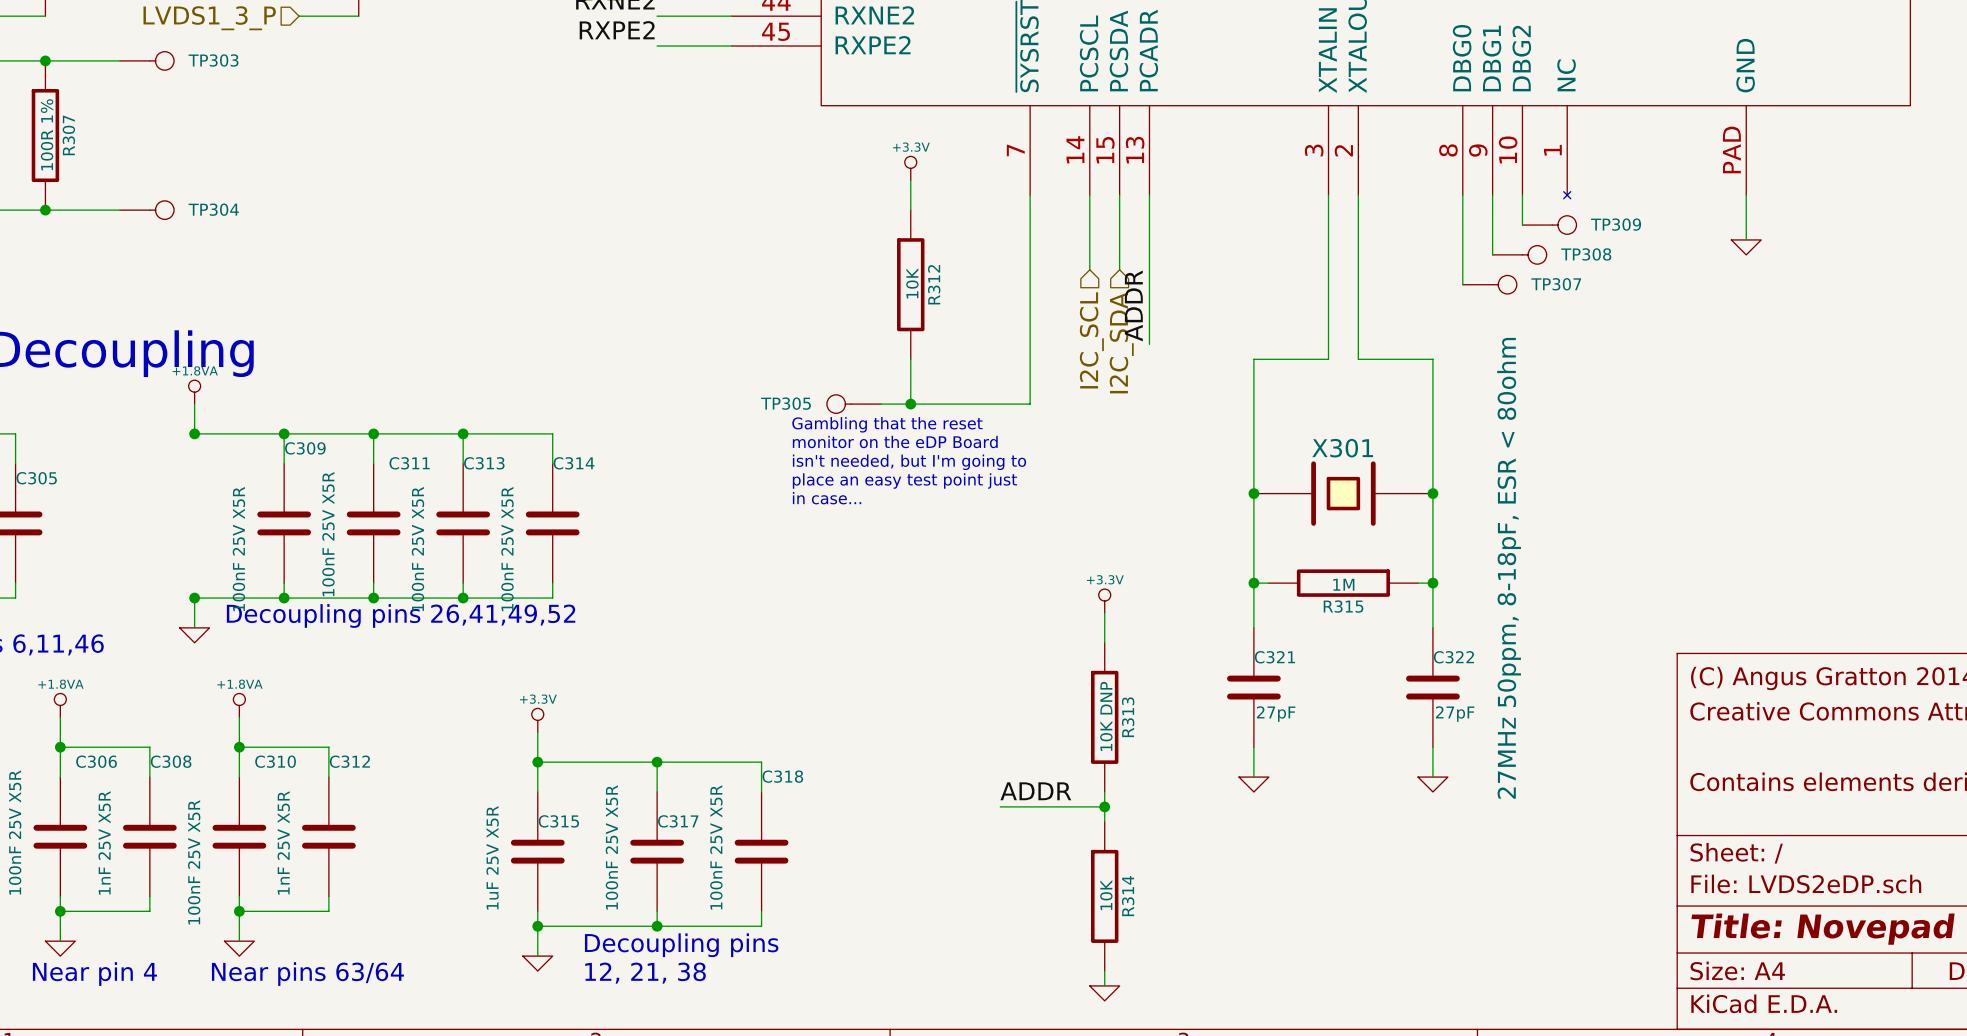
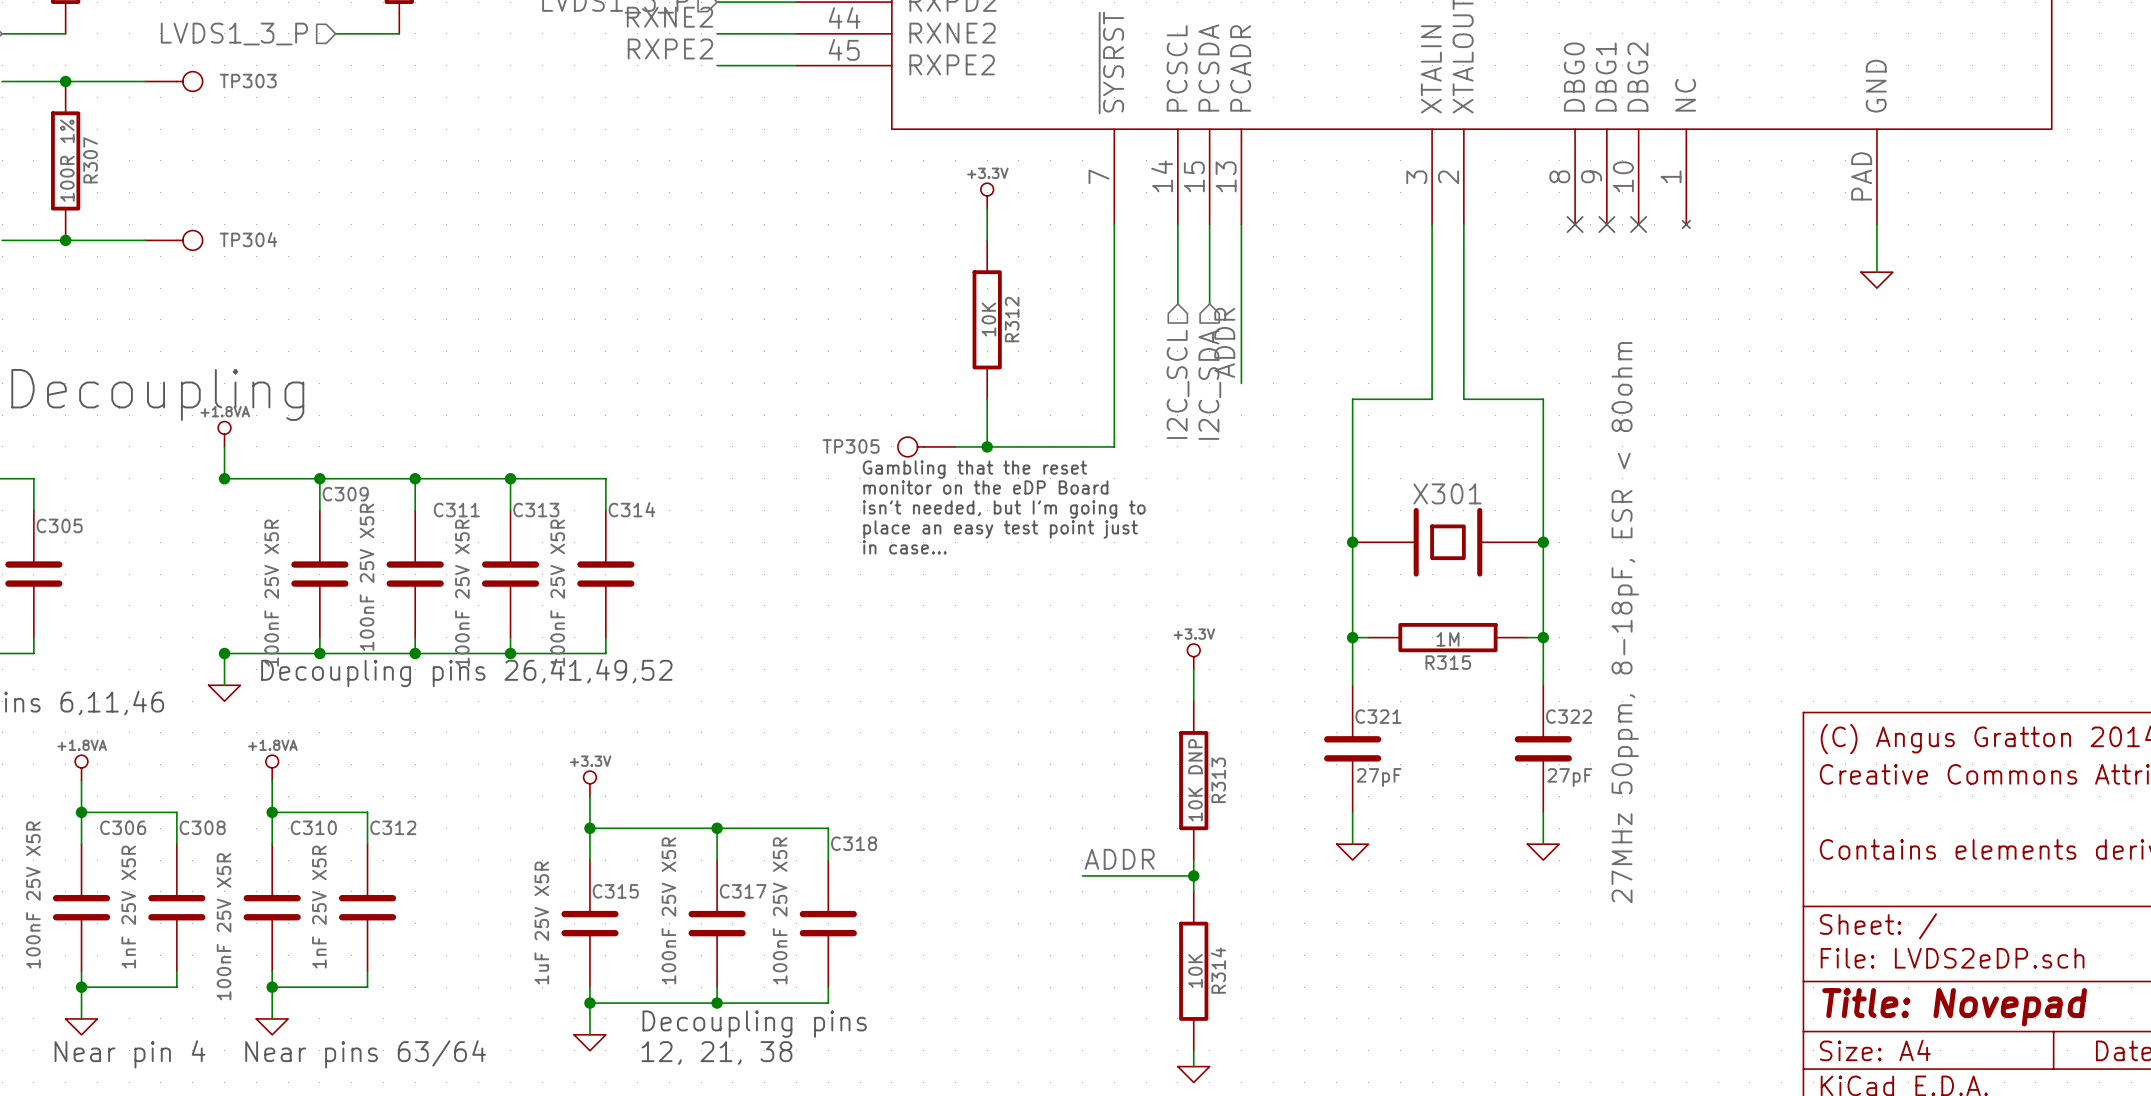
wire: (1462, 195) (1462, 284) -> none
no-connect mark: none -> (1575, 224)
wire: (1492, 195) (1492, 254) -> none
no-connect mark: none -> (1606, 224)
wire: (1522, 195) (1522, 225) -> none
no-connect mark: none -> (1638, 224)
TP309: (1549, 225) -> none
TP308: (1519, 254) -> none
TP307: (1489, 284) -> none

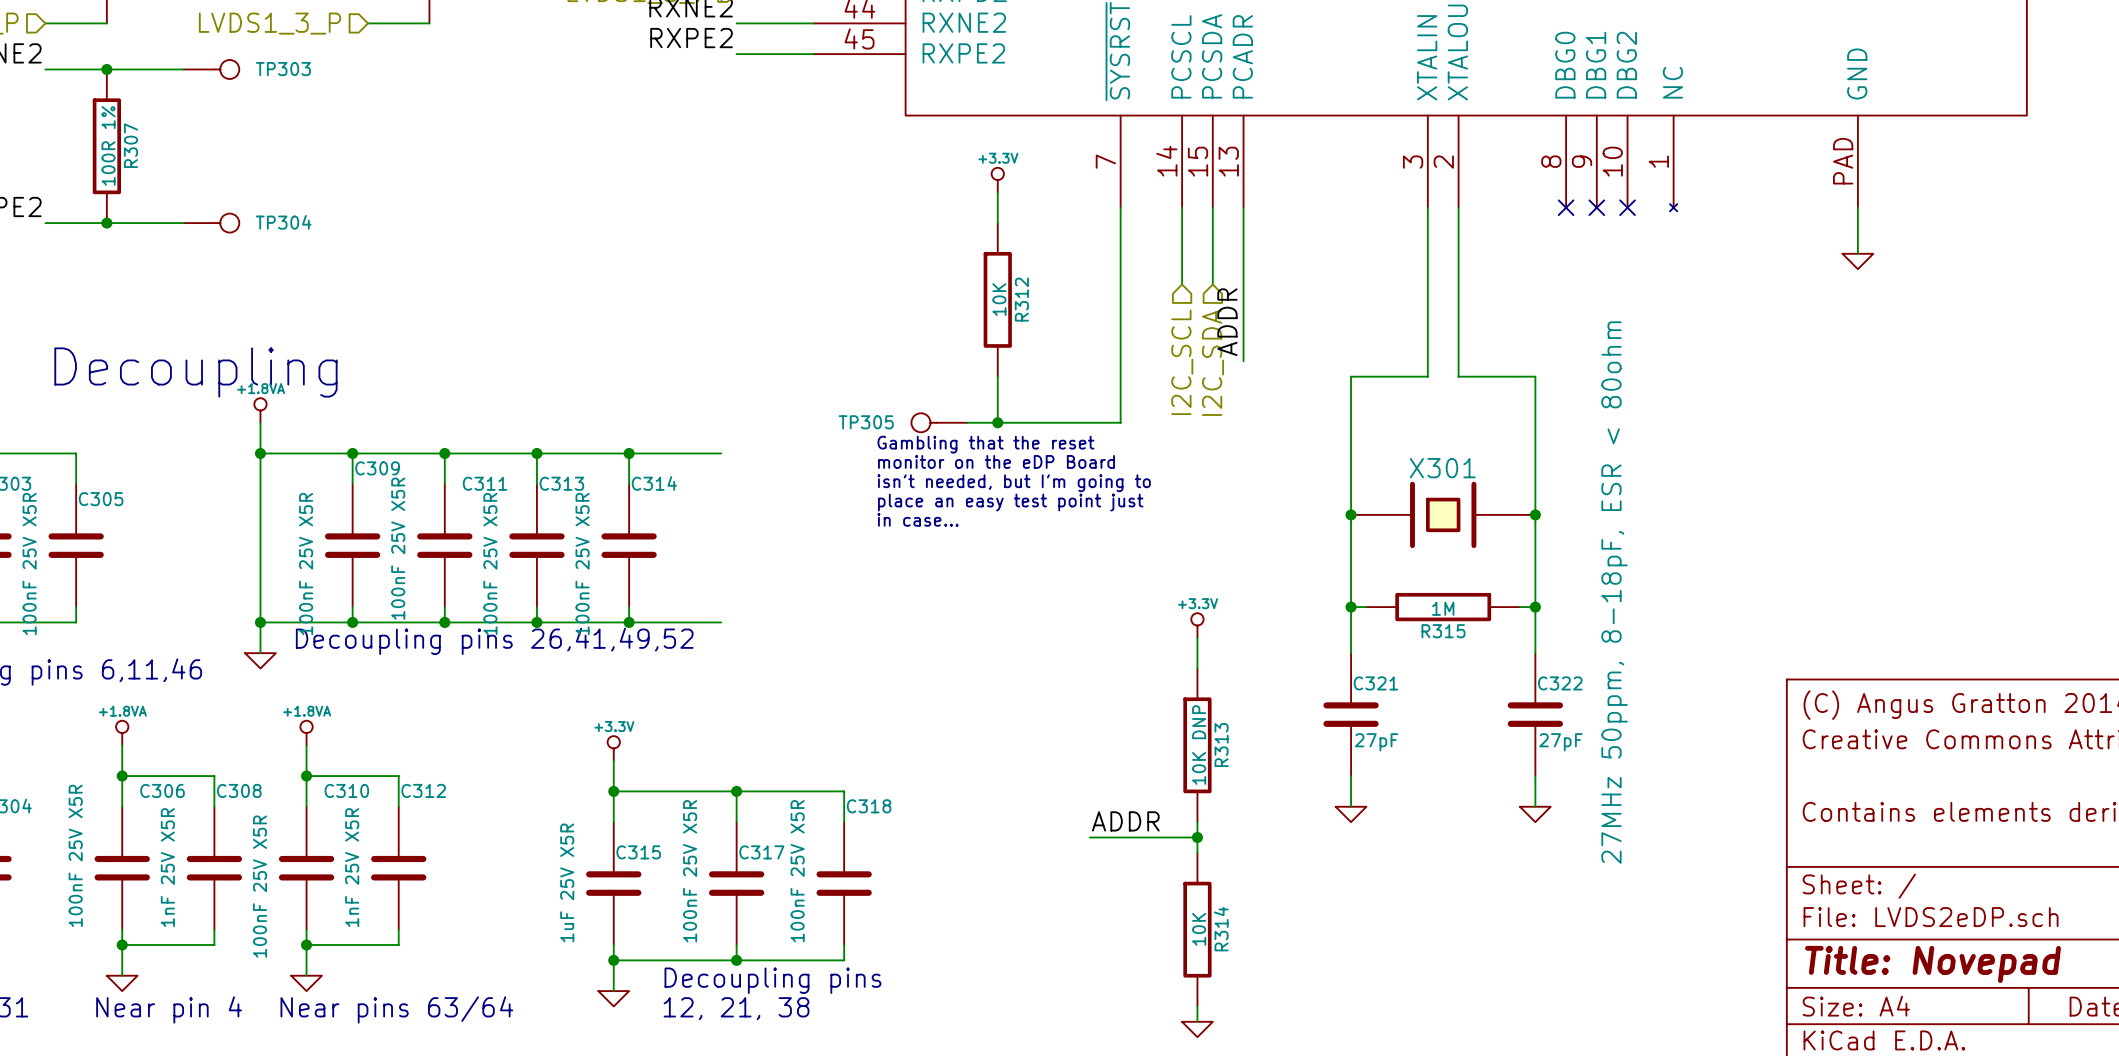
wire: none -> (260, 453) (260, 622)
wire: none -> (629, 453) (721, 453)
junction: none -> (629, 453)
wire: none -> (629, 622) (721, 622)
junction: none -> (629, 622)

